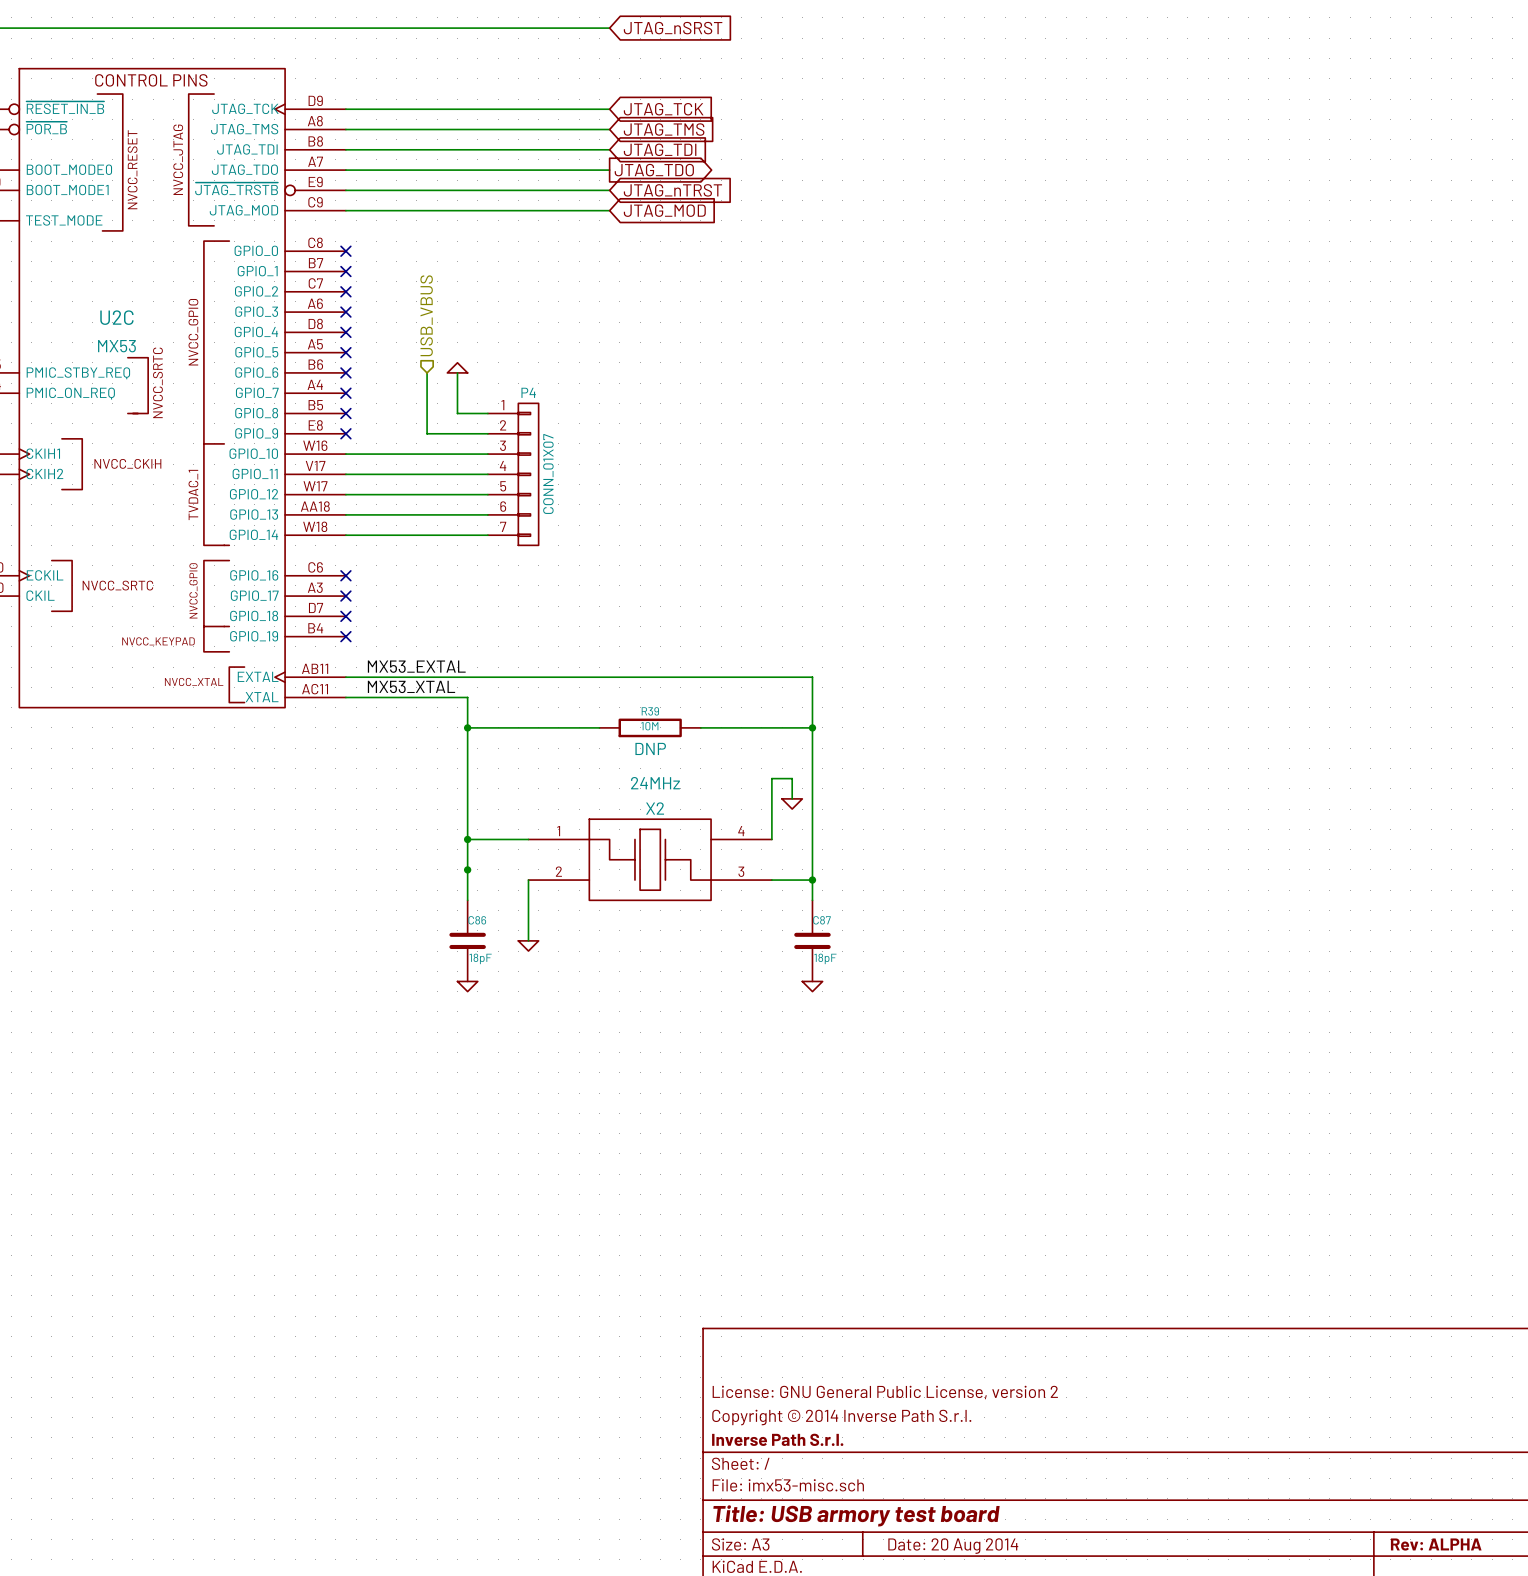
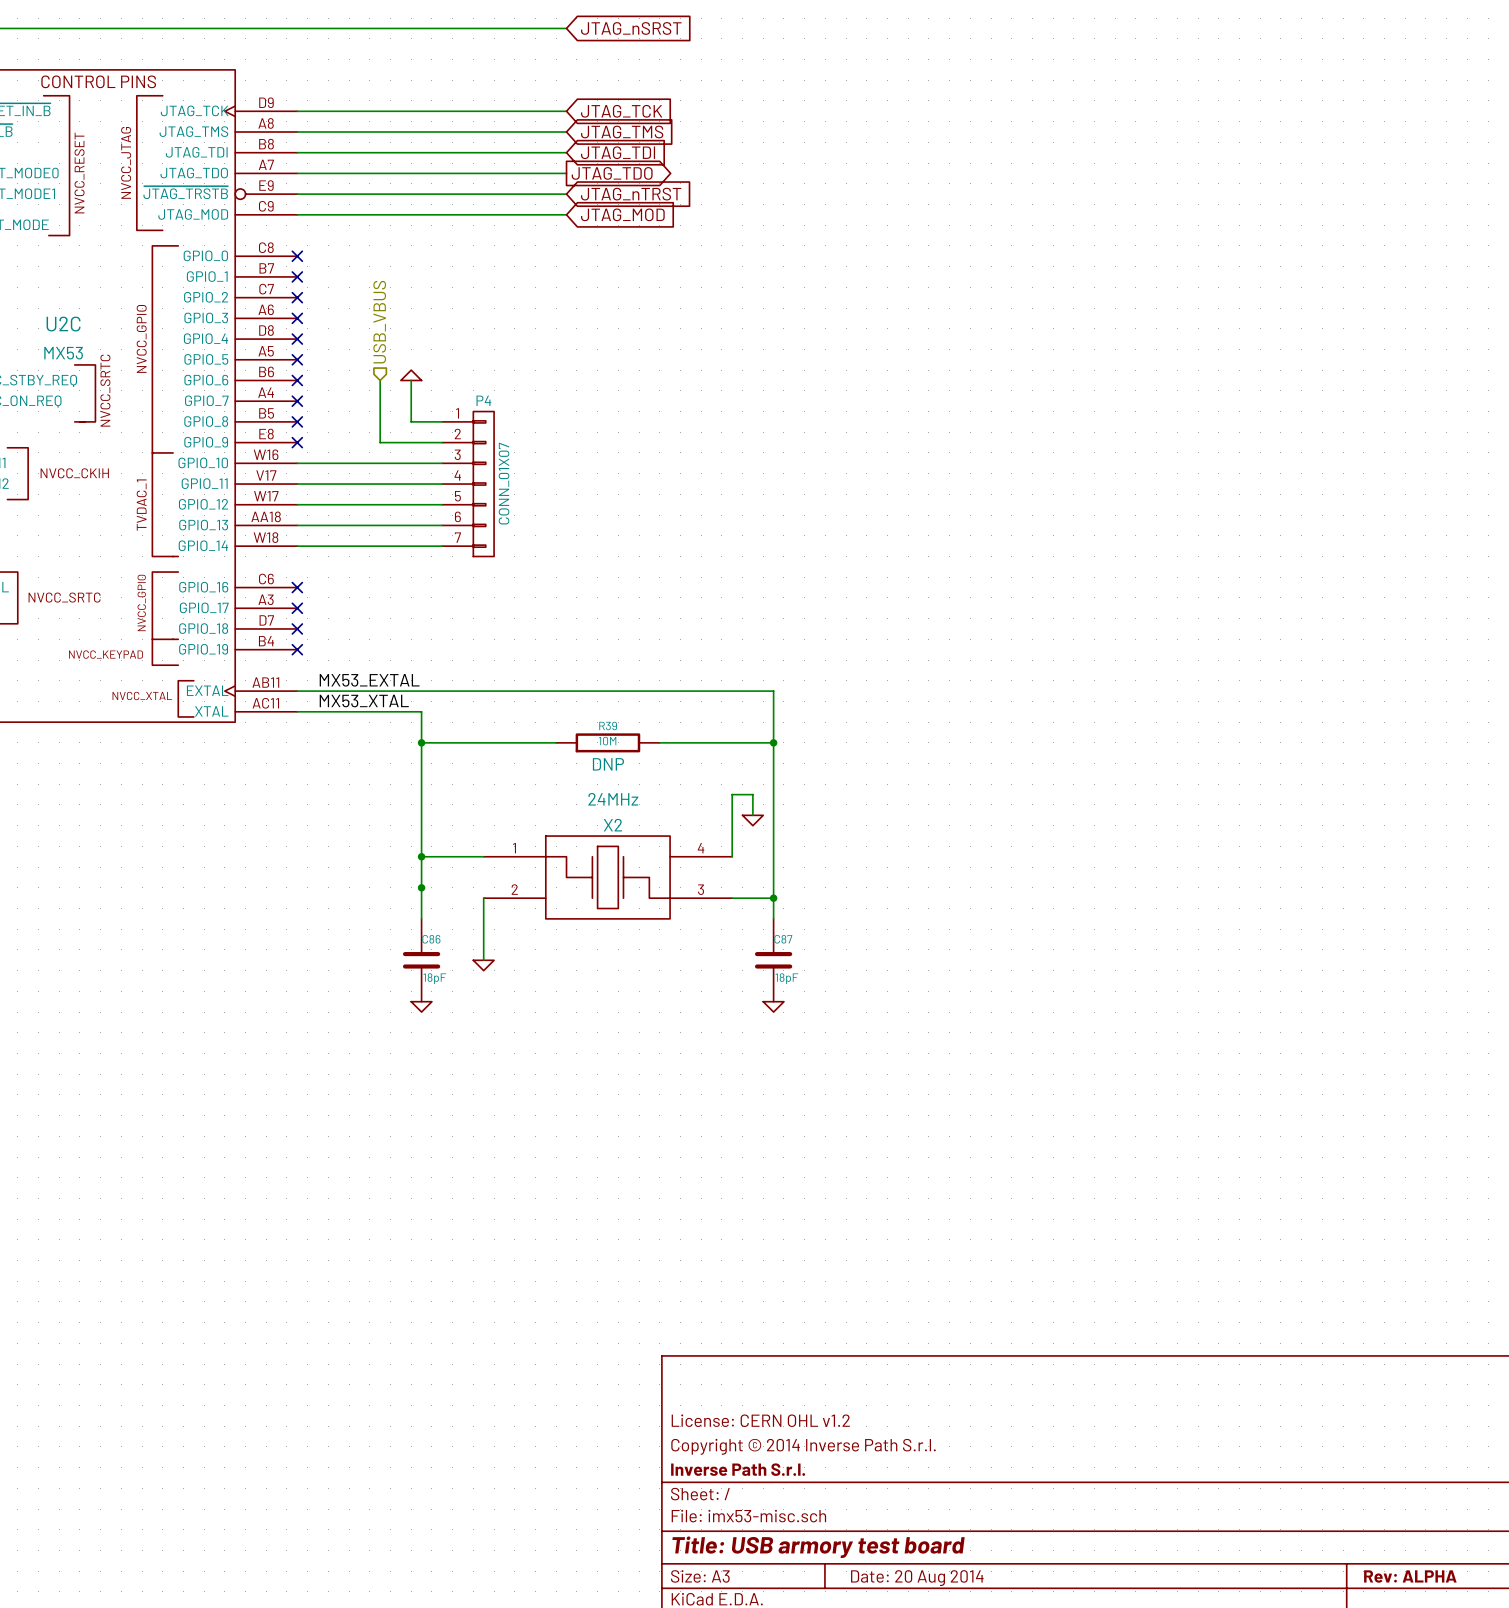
title block: License: GNU General Public License, version 2 (885, 1392) -> License: CERN OHL v1.2 (760, 1420)

